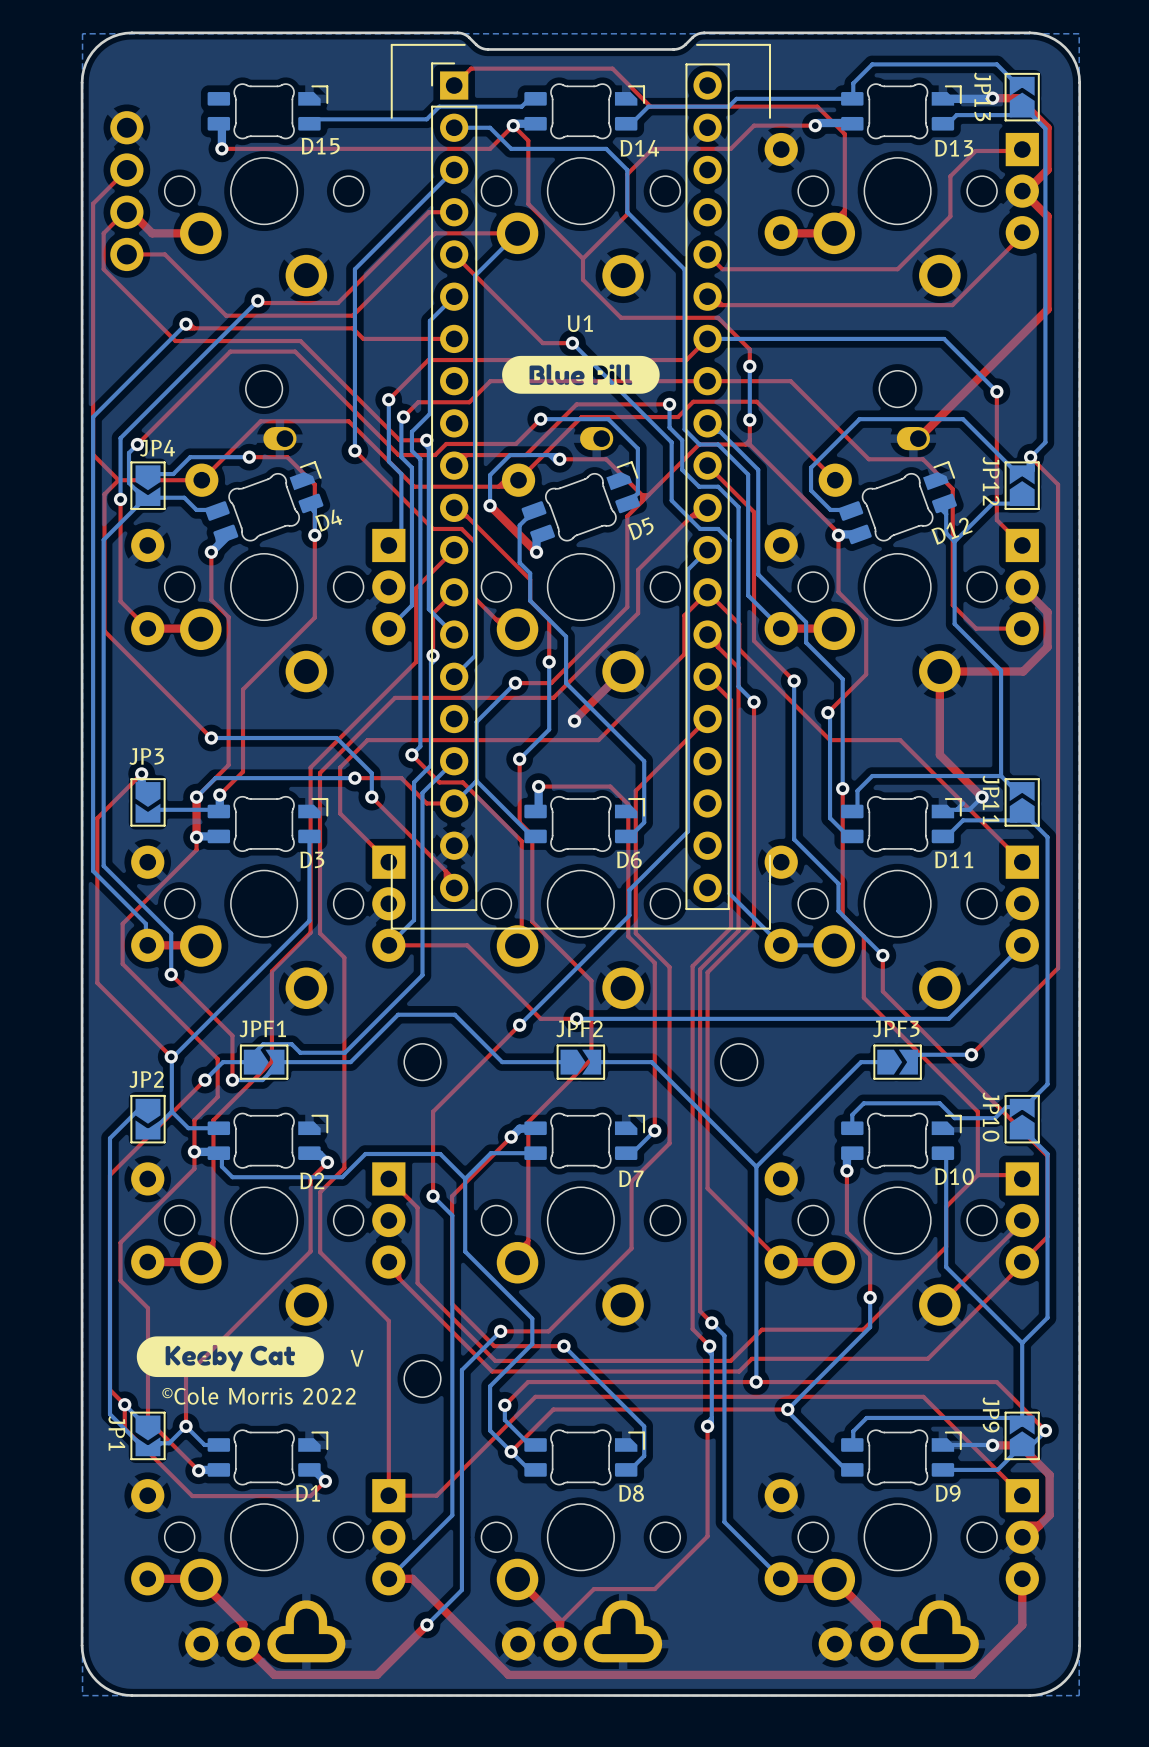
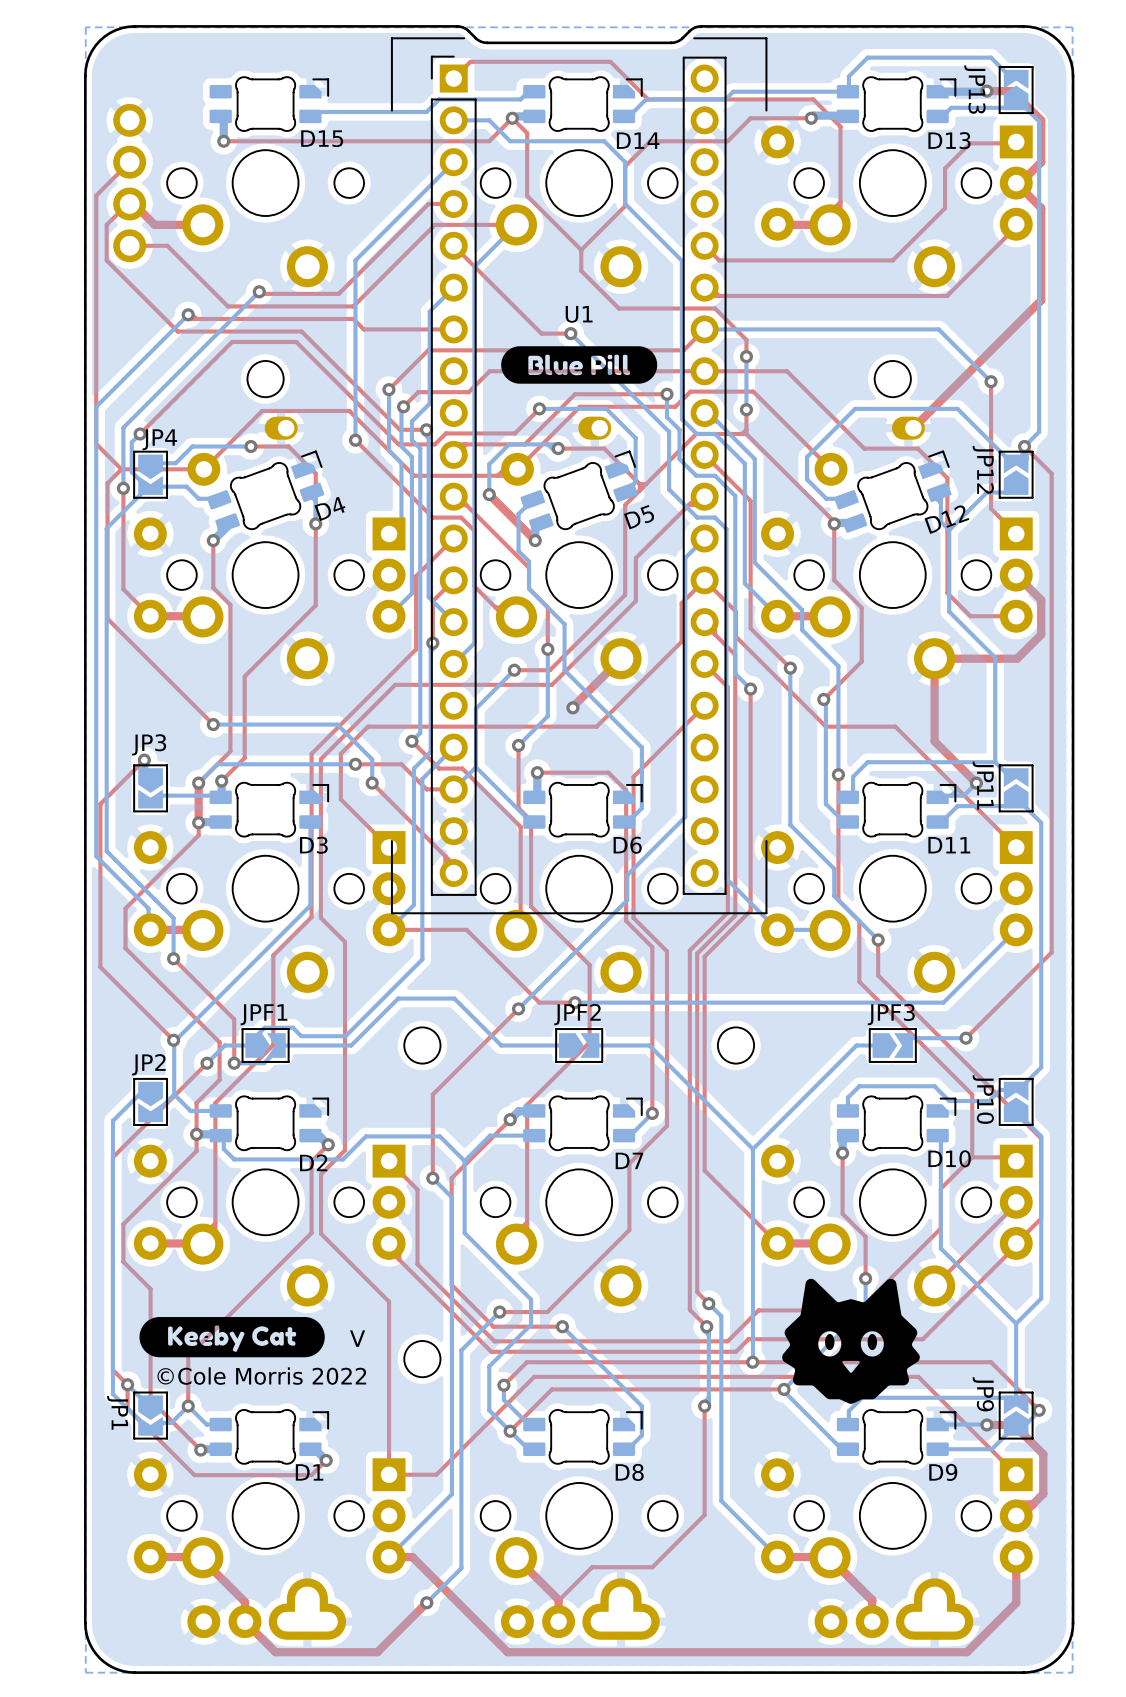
drawing: none -> [782, 1278, 920, 1404]

